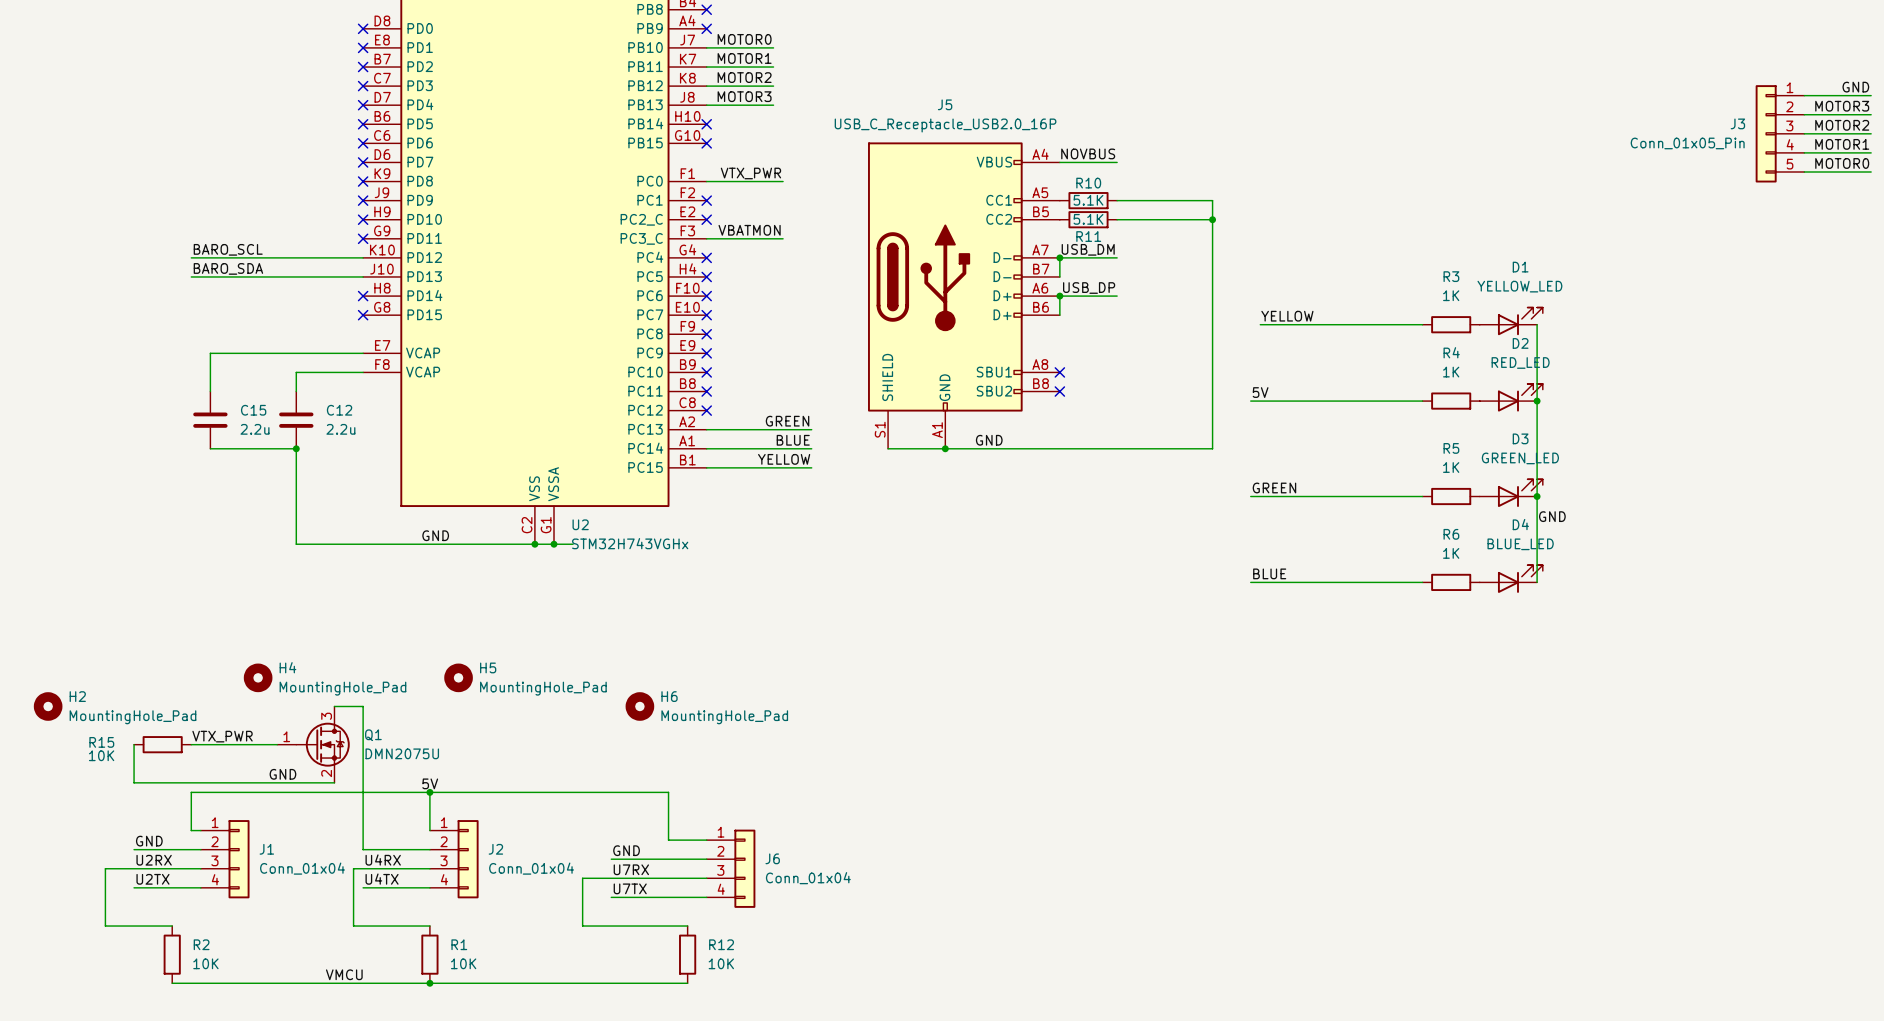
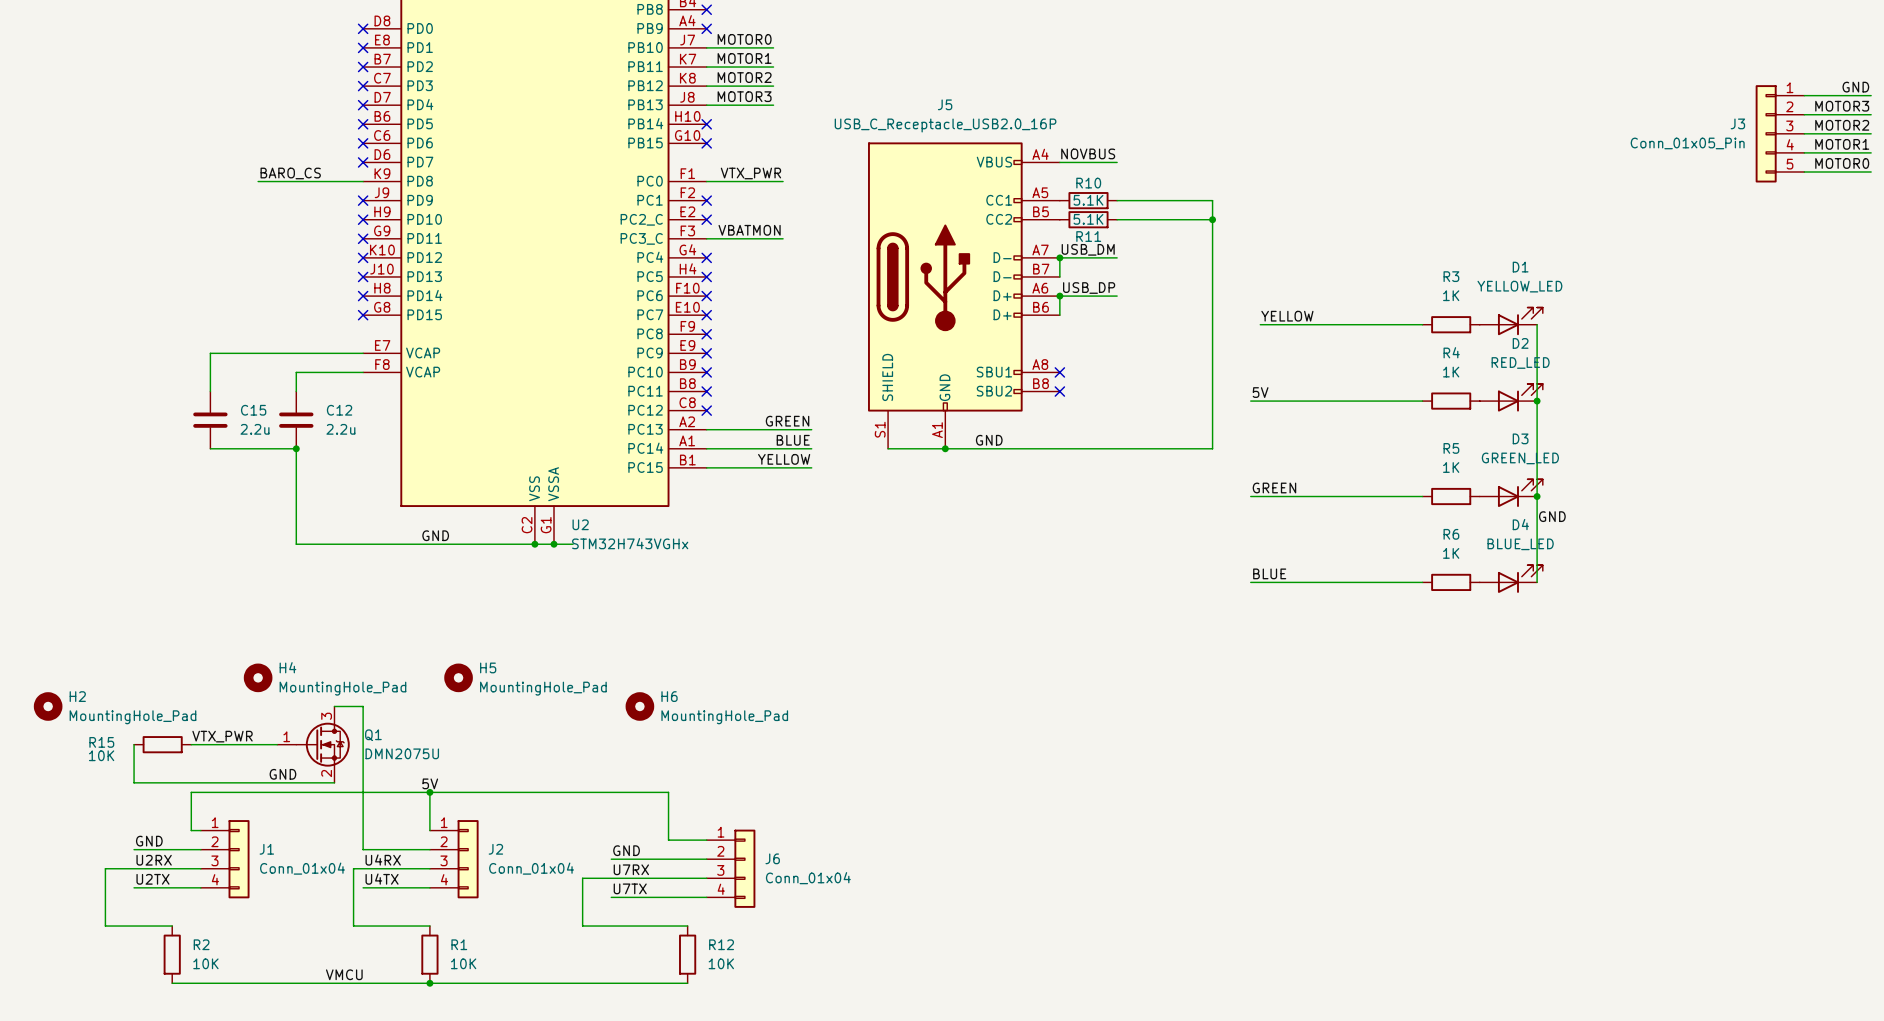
label: none -> BARO_CS (290, 173)
wire: none -> (258, 181) (363, 181)
no-connect mark: (363, 181) -> none
label: BARO_SCL (228, 249) -> none
wire: (191, 257) (363, 257) -> none
no-connect mark: none -> (363, 257)
label: BARO_SDA (228, 268) -> none
wire: (191, 276) (363, 276) -> none
no-connect mark: none -> (363, 276)

